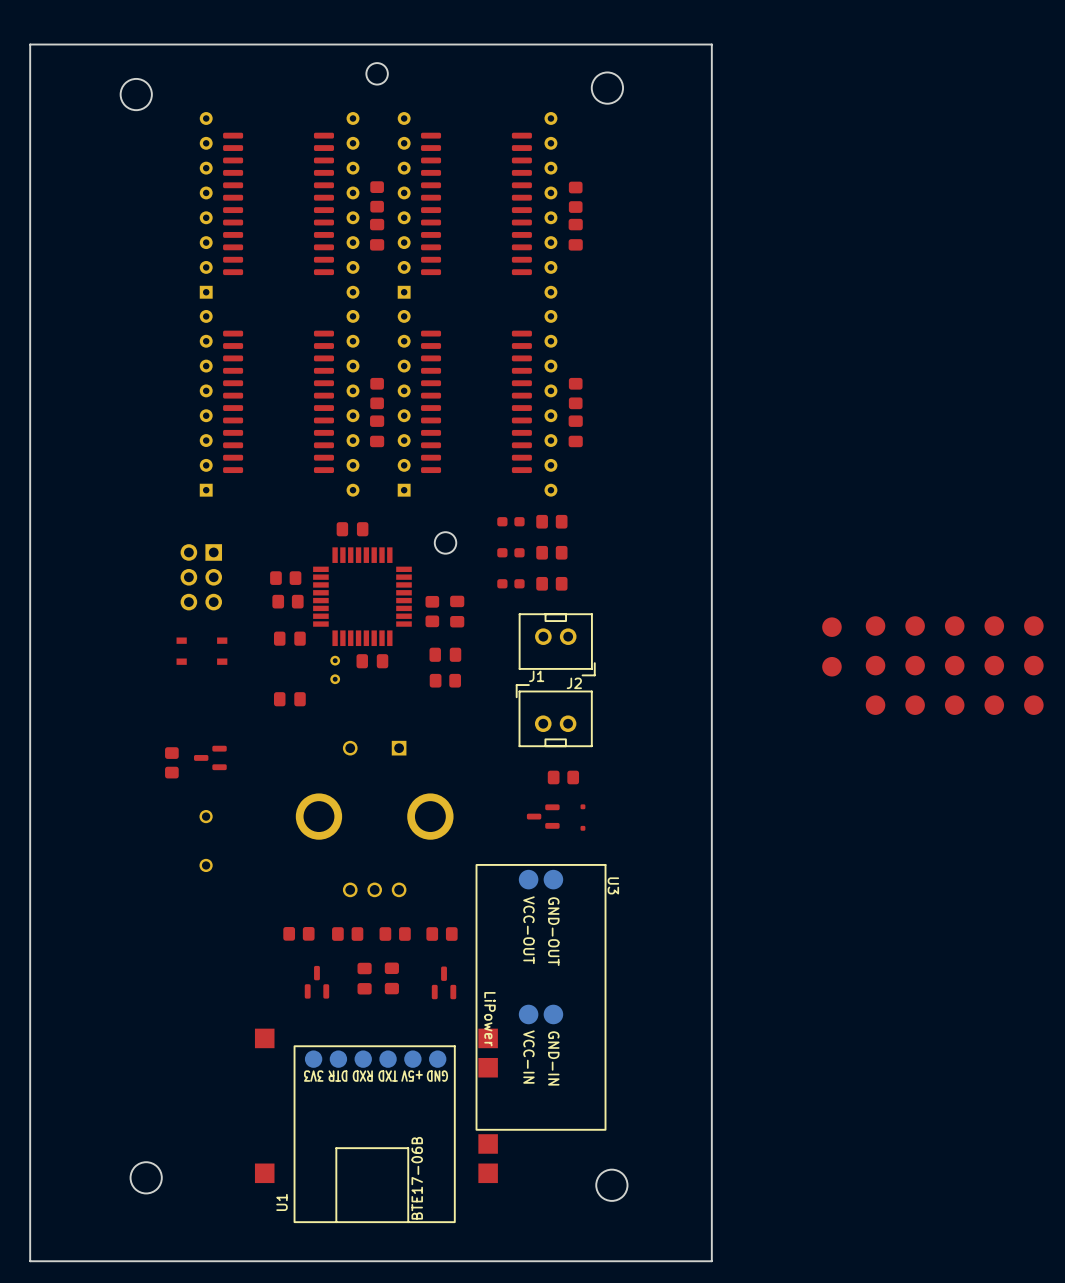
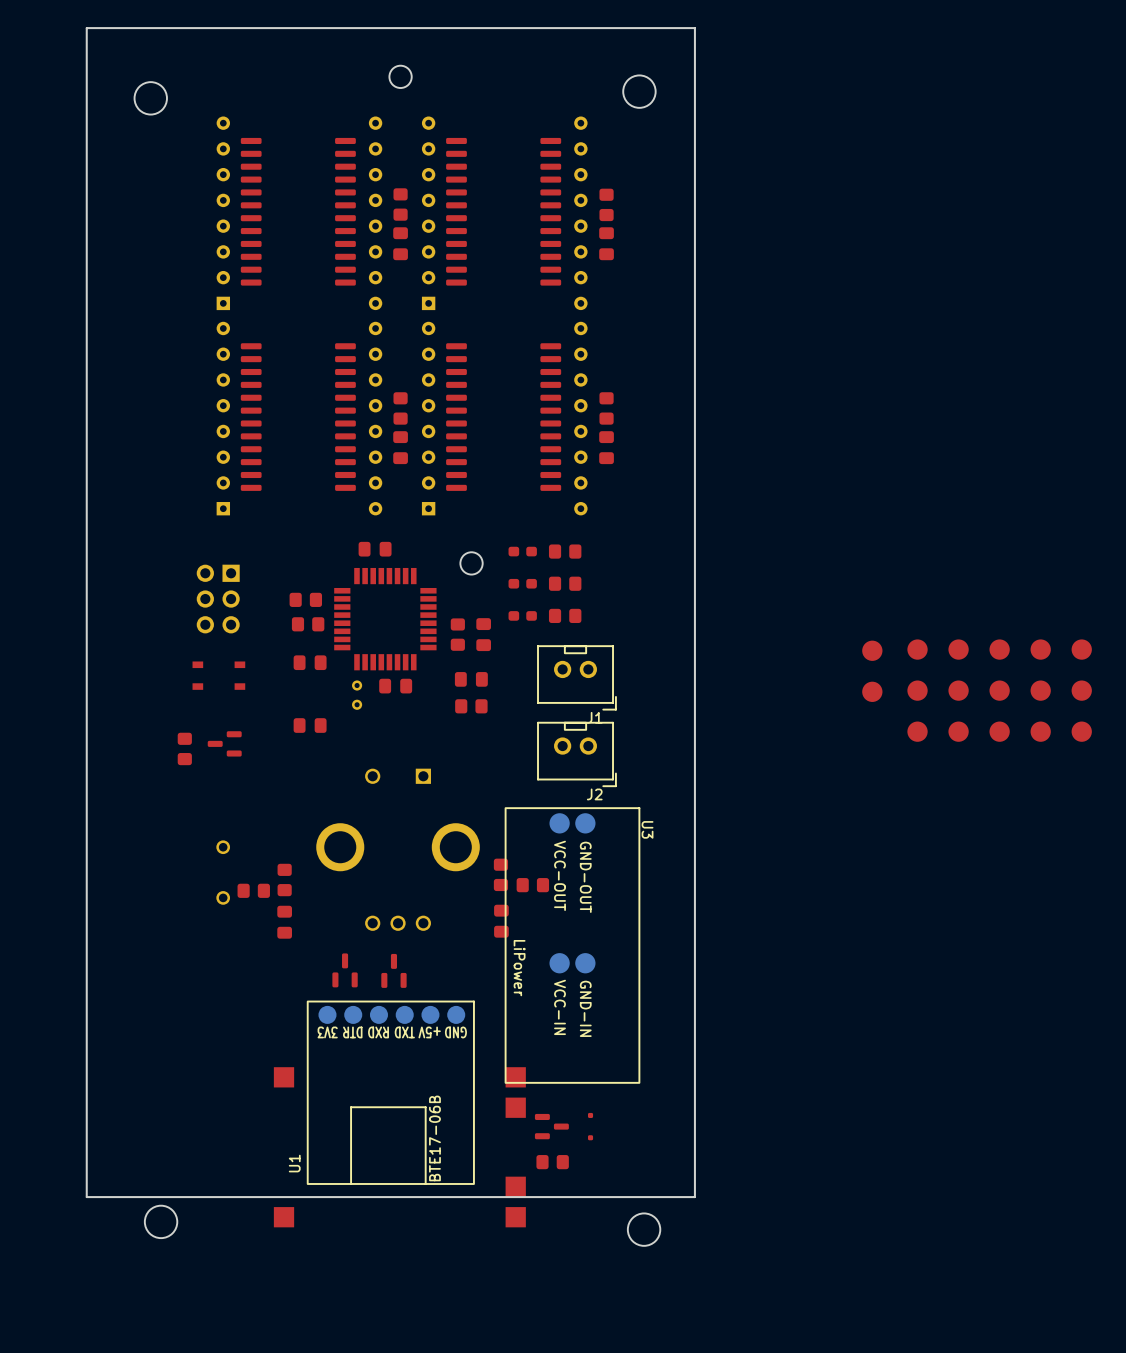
board edge: (711, 44) (30, 44) (30, 1261) (711, 1261) (711, 44) -> (694, 28) (694, 1197) (86, 1197) (86, 28) (694, 28)
part: (510, 521) -> none
part: (551, 521) -> none
part: none -> (522, 551)
part: none -> (565, 551)
part: (510, 552) -> none
part: (551, 552) -> none
part: none -> (522, 583)
part: none -> (565, 583)
part: (510, 583) -> none
part: (551, 583) -> none
part: none -> (522, 615)
part: none -> (565, 615)
J2 position: (557, 644) -> (576, 754)
J1 rotation: 0° (554, 715) -> 180° (576, 677)
J1 position: (554, 715) -> (576, 677)
part position: (210, 757) -> (224, 743)
part position: (171, 762) -> (184, 748)
part: (563, 777) -> none
part: (543, 816) -> none
part: (582, 817) -> none
part: none -> (500, 874)
part: none -> (284, 880)
part: none -> (532, 885)
part: none -> (253, 890)
part: none -> (501, 921)
part: none -> (284, 922)
part: (298, 933) -> none
part: (347, 934) -> none
part: (395, 934) -> none
part: (442, 934) -> none
part: none -> (345, 970)
part: none -> (393, 970)
part: (364, 978) -> none
part: (391, 978) -> none
part: (316, 982) -> none
part: (444, 982) -> none
U3 position: (541, 997) -> (572, 945)
part: none -> (551, 1126)
part: none -> (590, 1126)
part: none -> (552, 1162)
U1 position: (374, 1134) -> (390, 1092)

